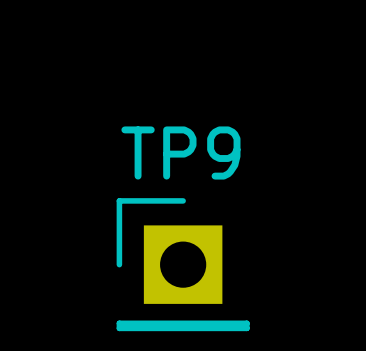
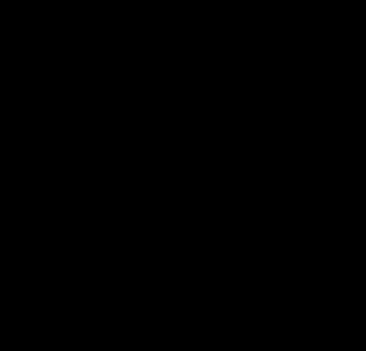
TP9: (183, 264) -> none

